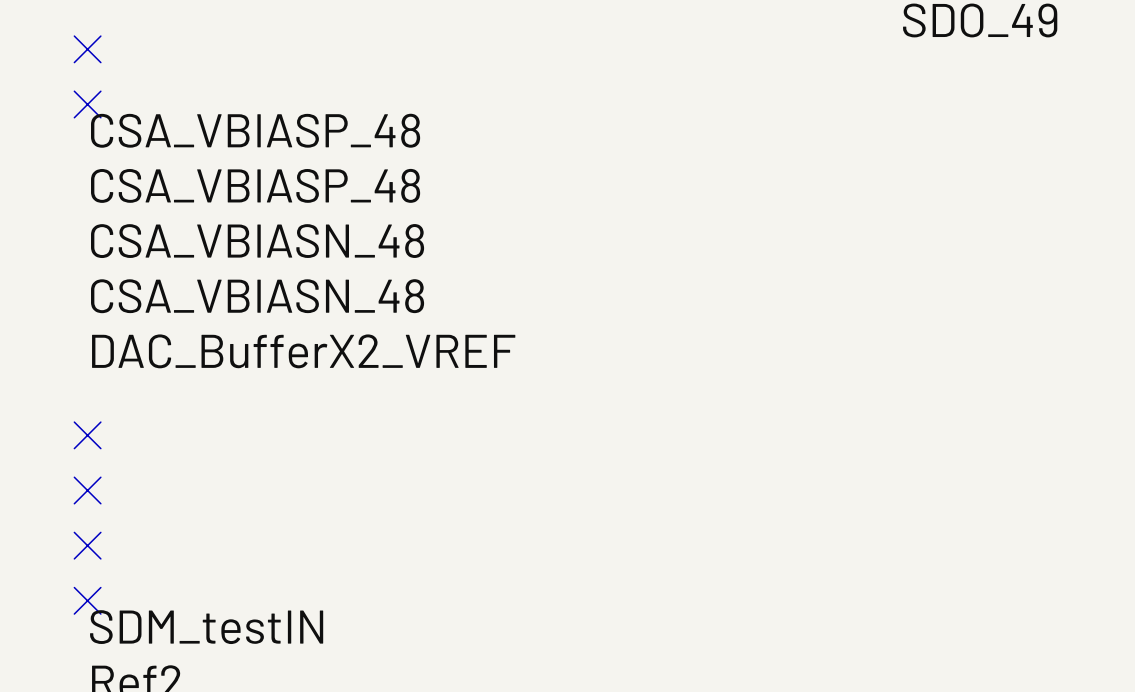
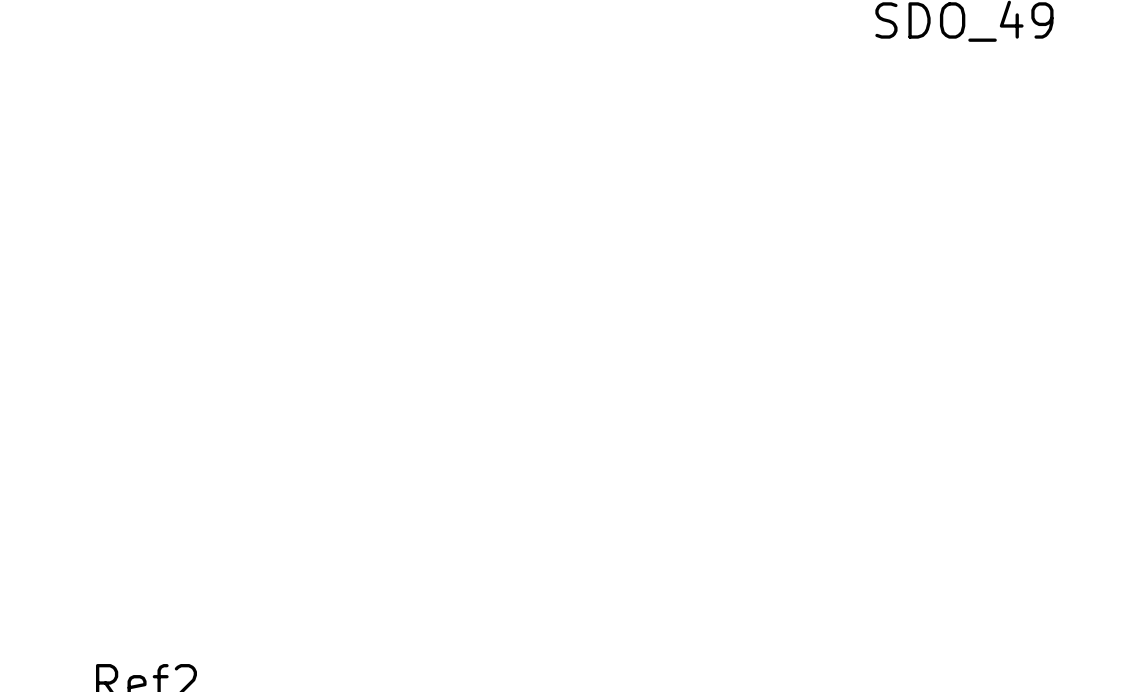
no-connect mark: (87, 49) -> none
no-connect mark: (87, 104) -> none
label: CSA_VBIASP_48 (255, 130) -> none
label: CSA_VBIASP_48 (255, 185) -> none
label: CSA_VBIASN_48 (257, 241) -> none
label: CSA_VBIASN_48 (257, 296) -> none
label: DAC_BufferX2_VREF (303, 351) -> none
no-connect mark: (87, 435) -> none
no-connect mark: (87, 490) -> none
no-connect mark: (87, 545) -> none
no-connect mark: (87, 600) -> none
label: SDM_testIN (206, 627) -> none

